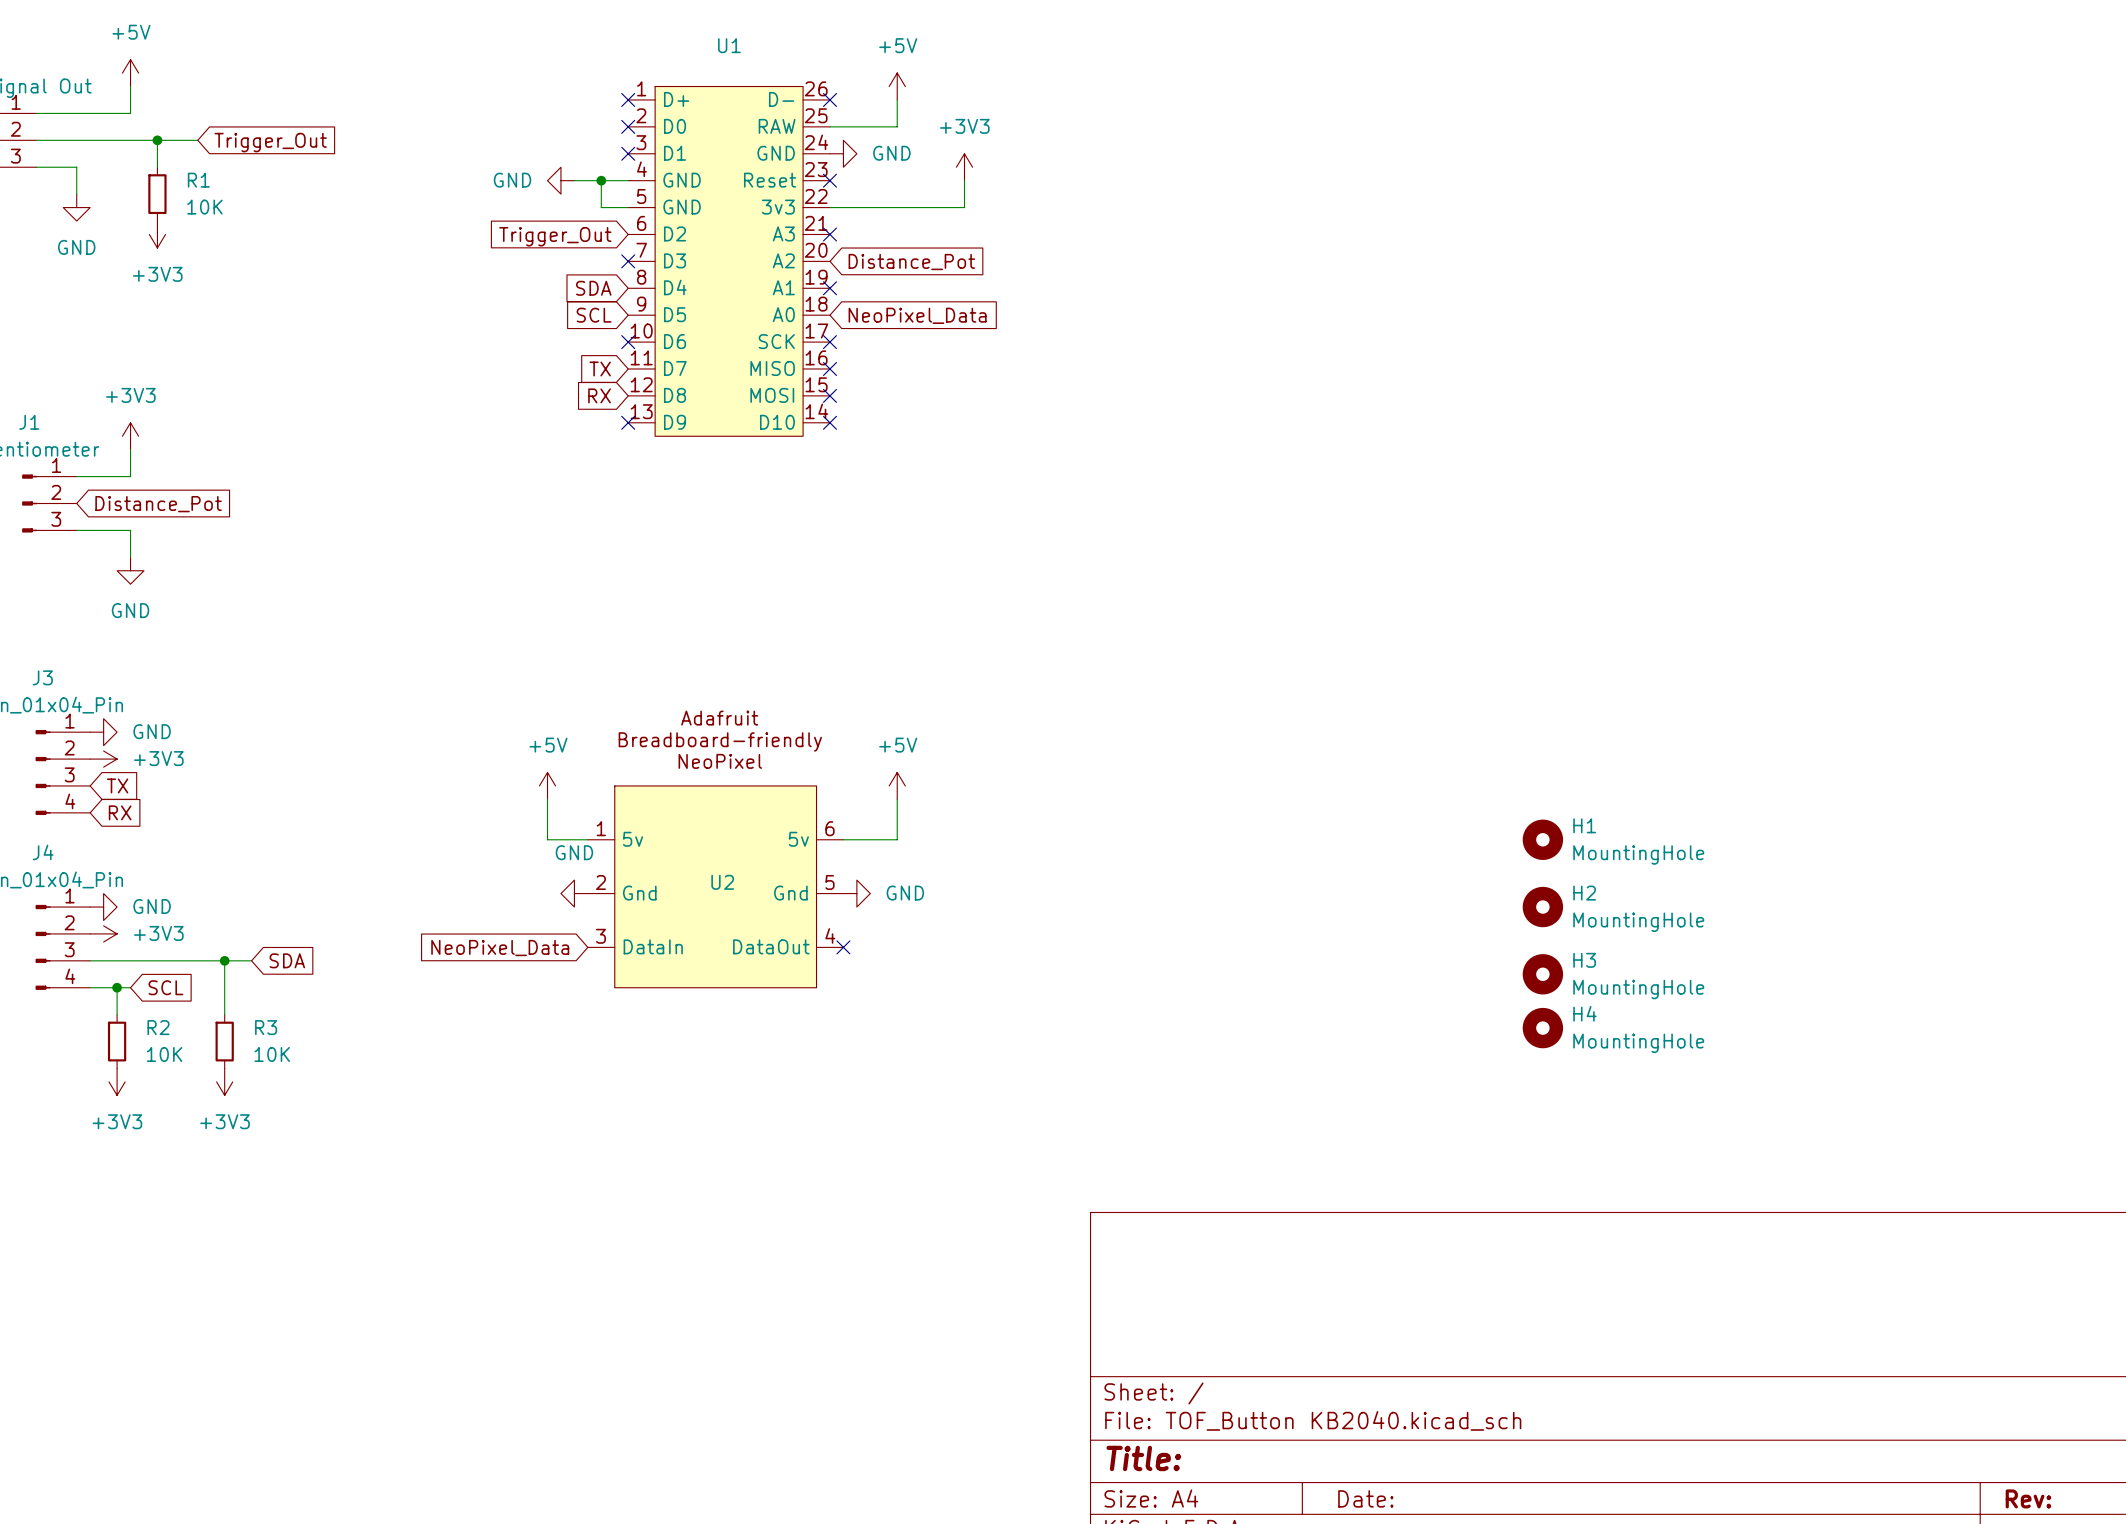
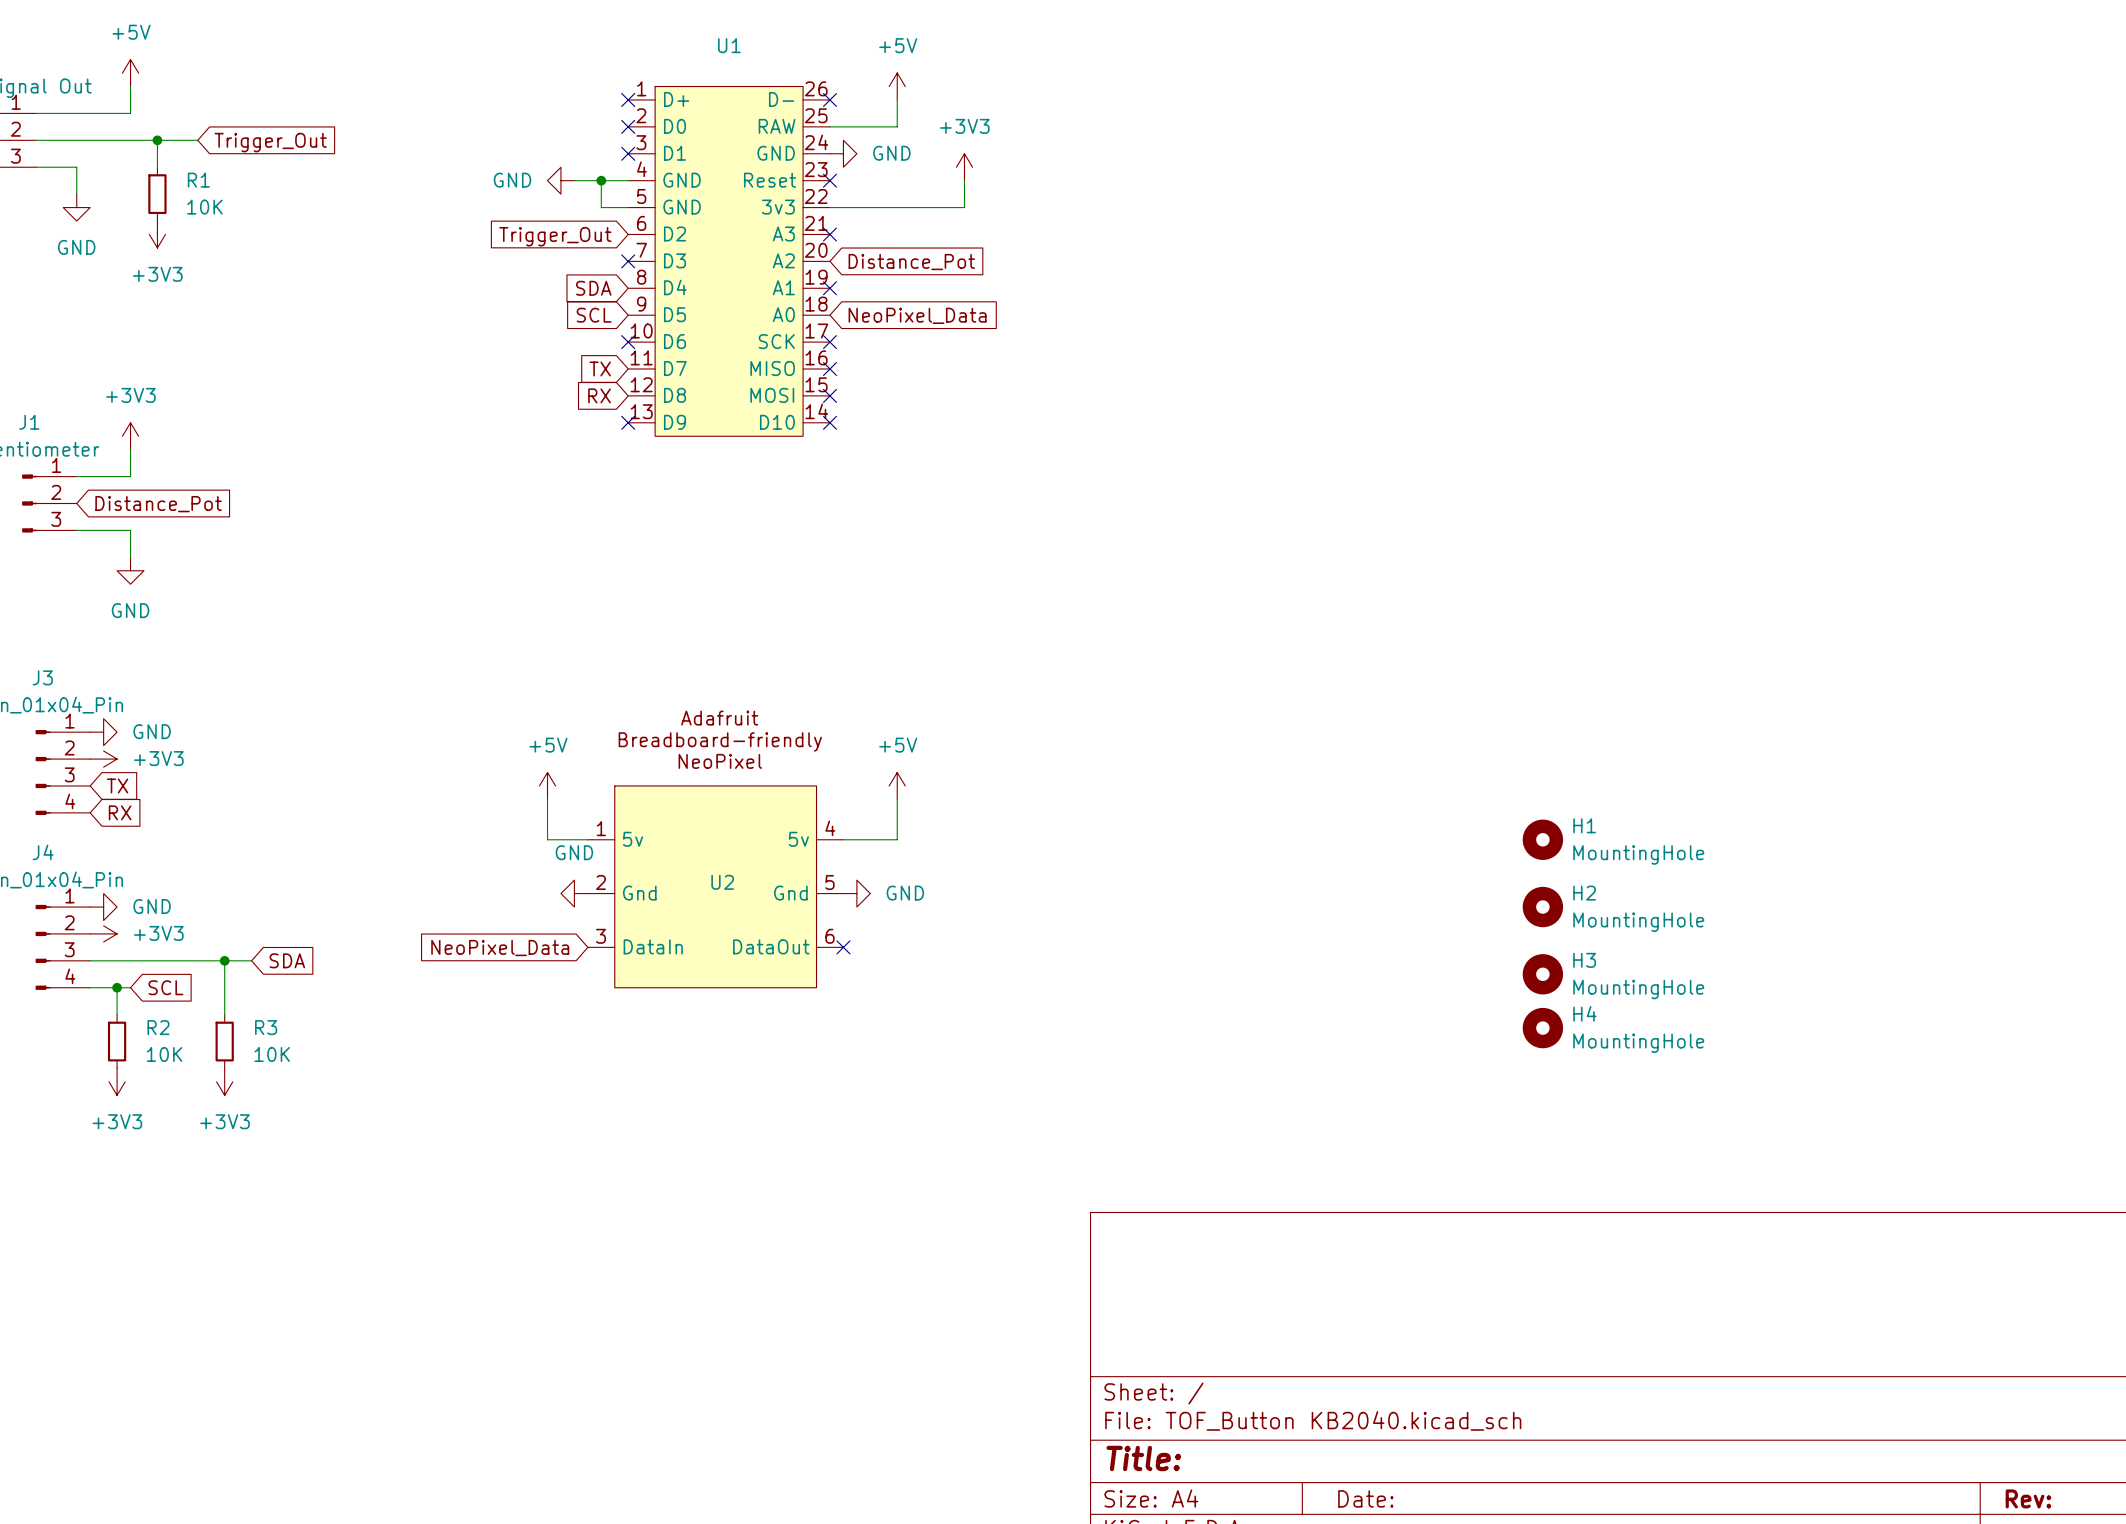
U2 pin number: 6 (829, 828) -> 4 (830, 828)
U2 pin number: 4 (830, 935) -> 6 (829, 936)

